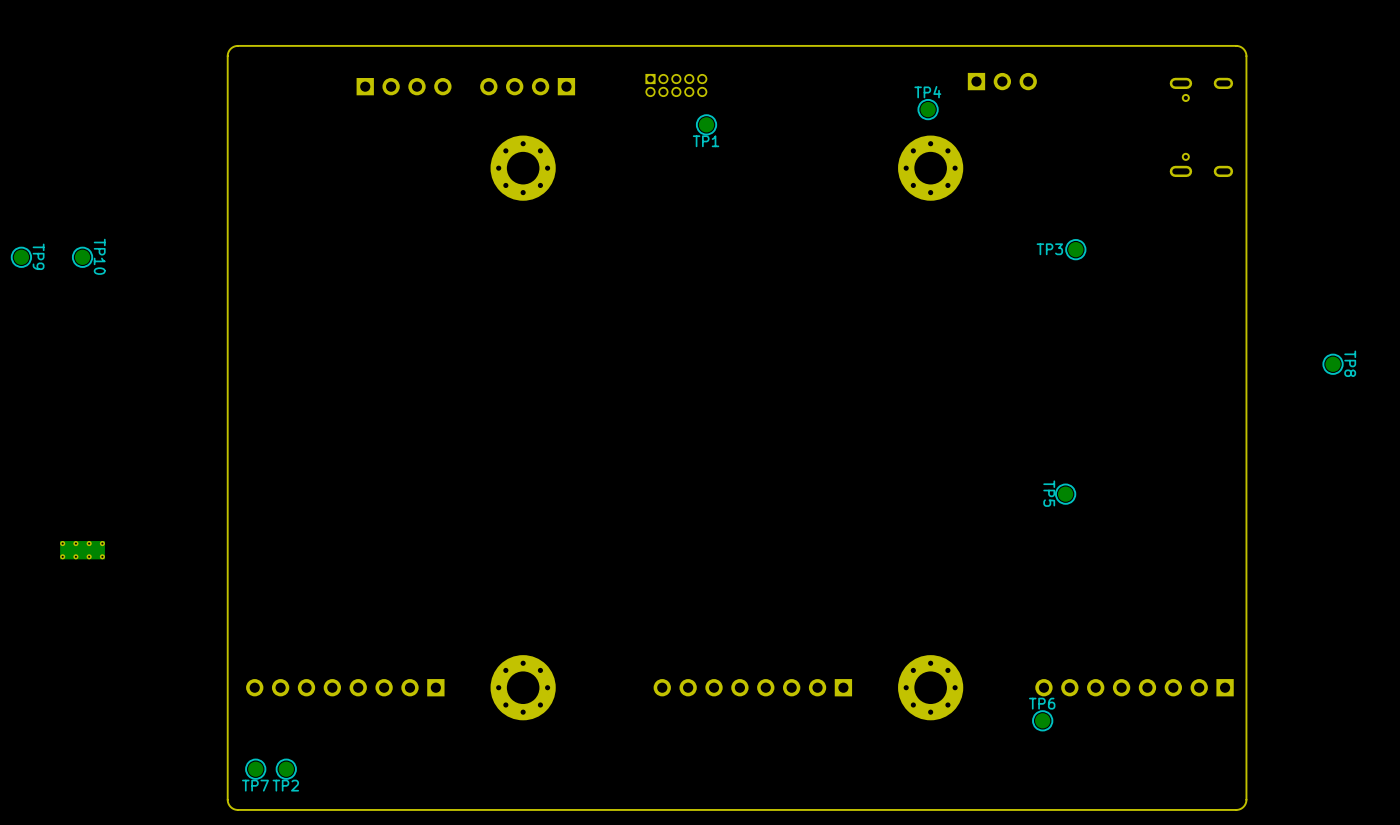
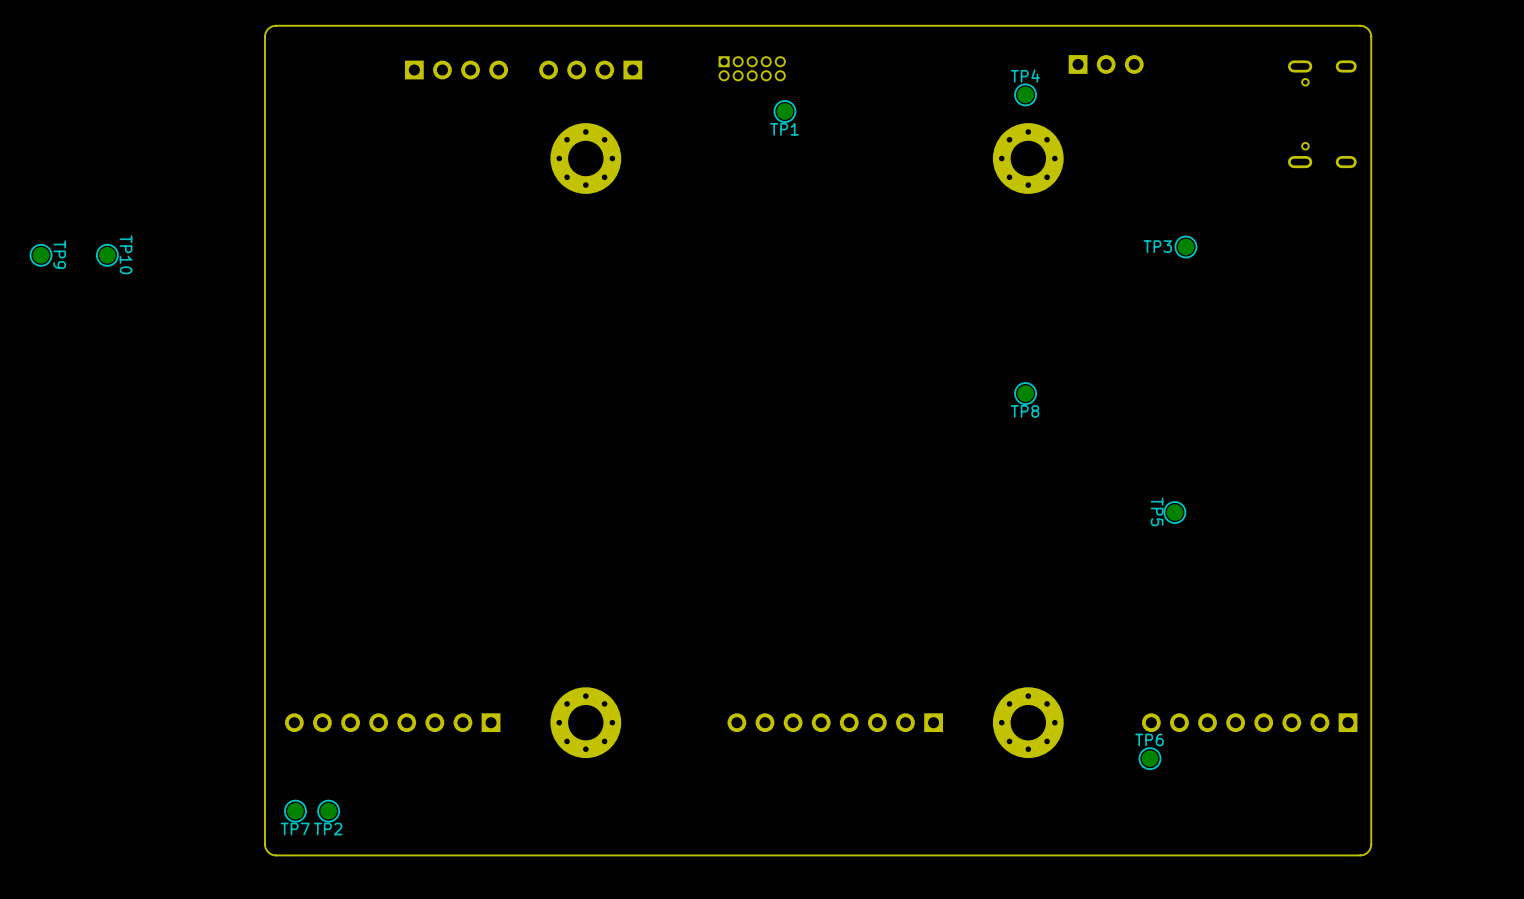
TP8 name rotation: 0° (1350, 363) -> 90° counterclockwise (1025, 411)
TP8 position: (1333, 364) -> (1025, 393)
part: (82, 550) -> none

